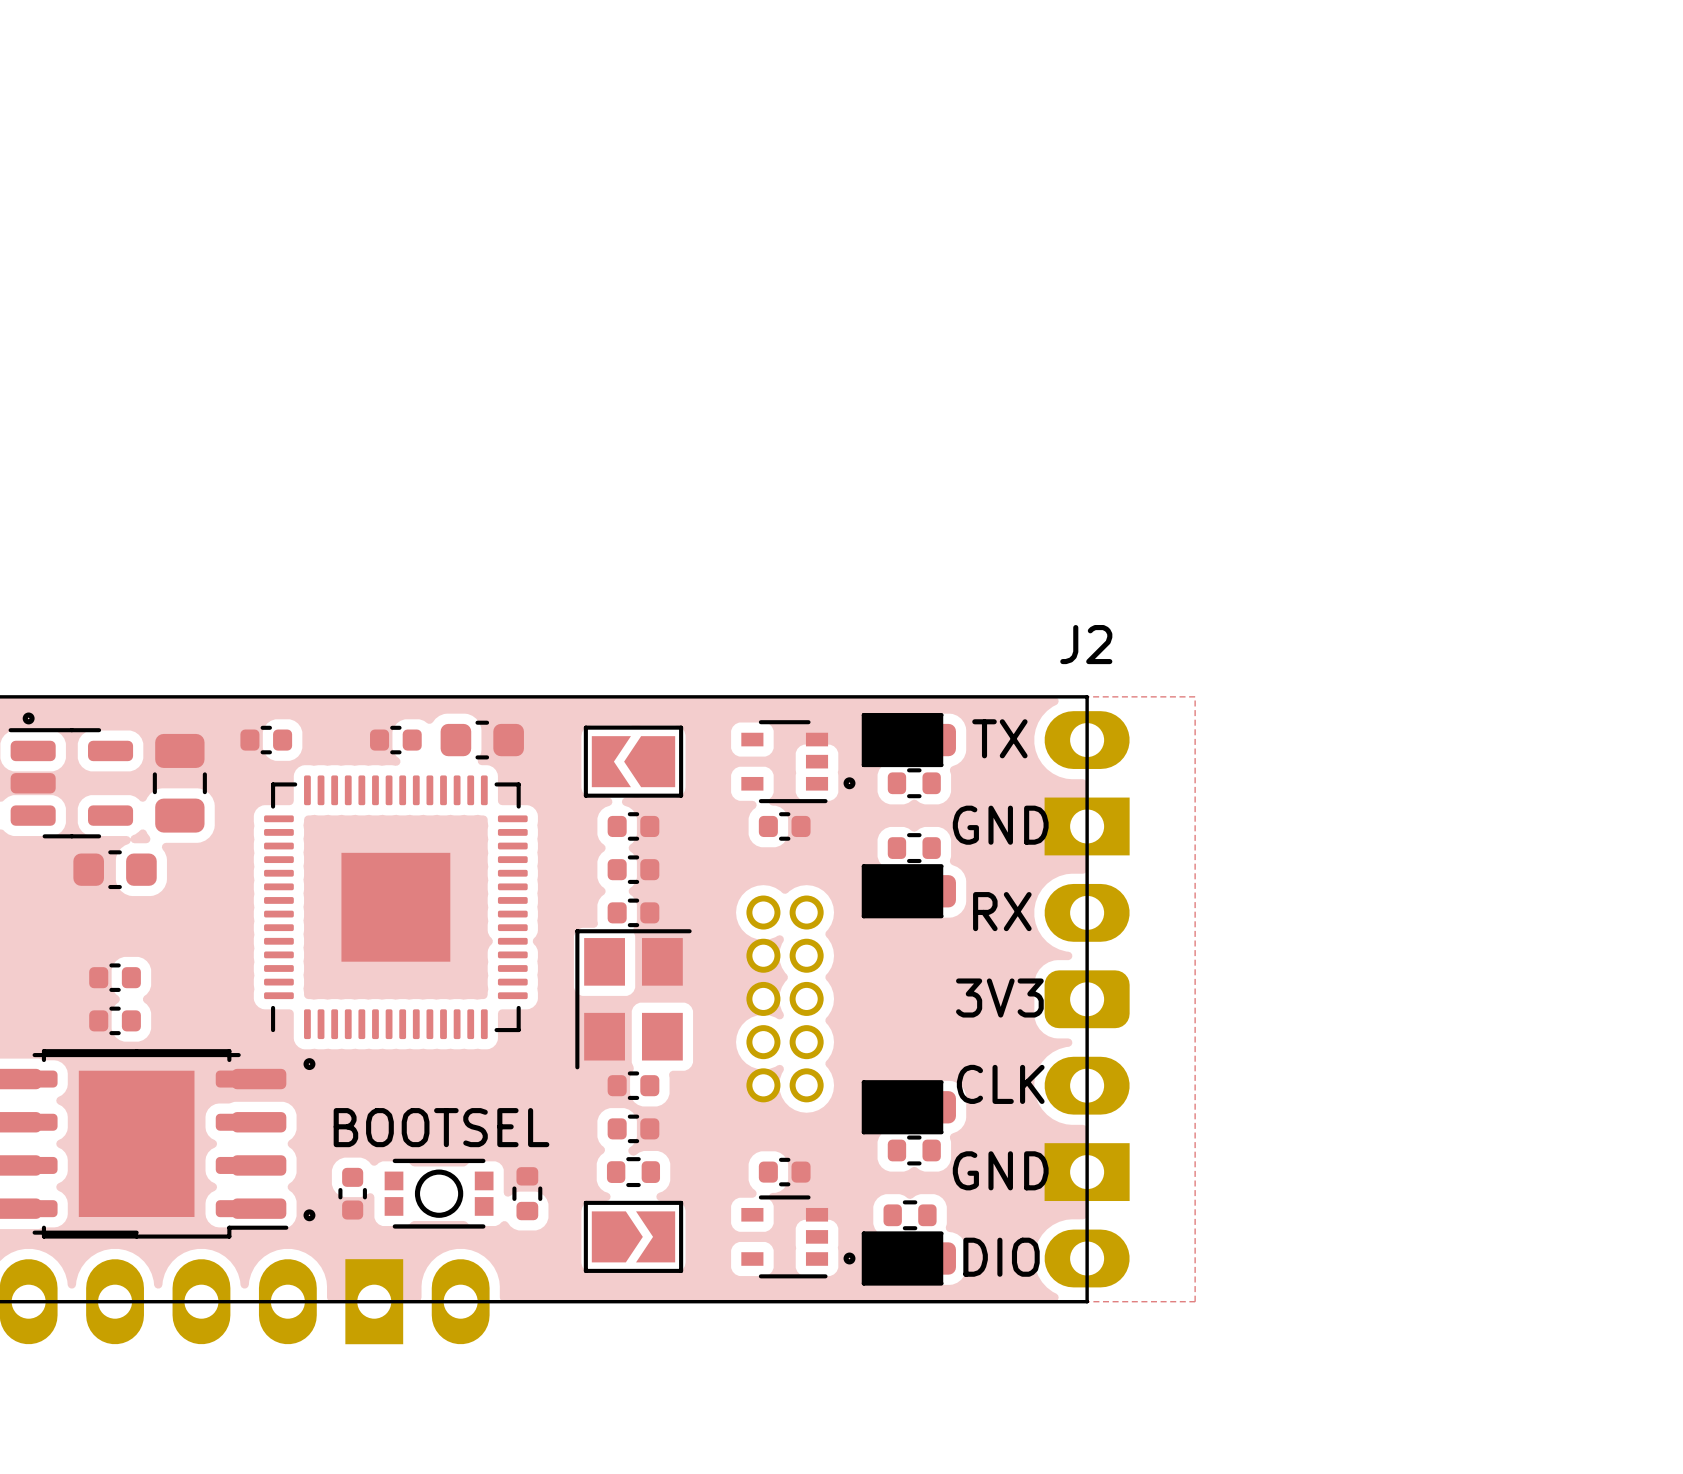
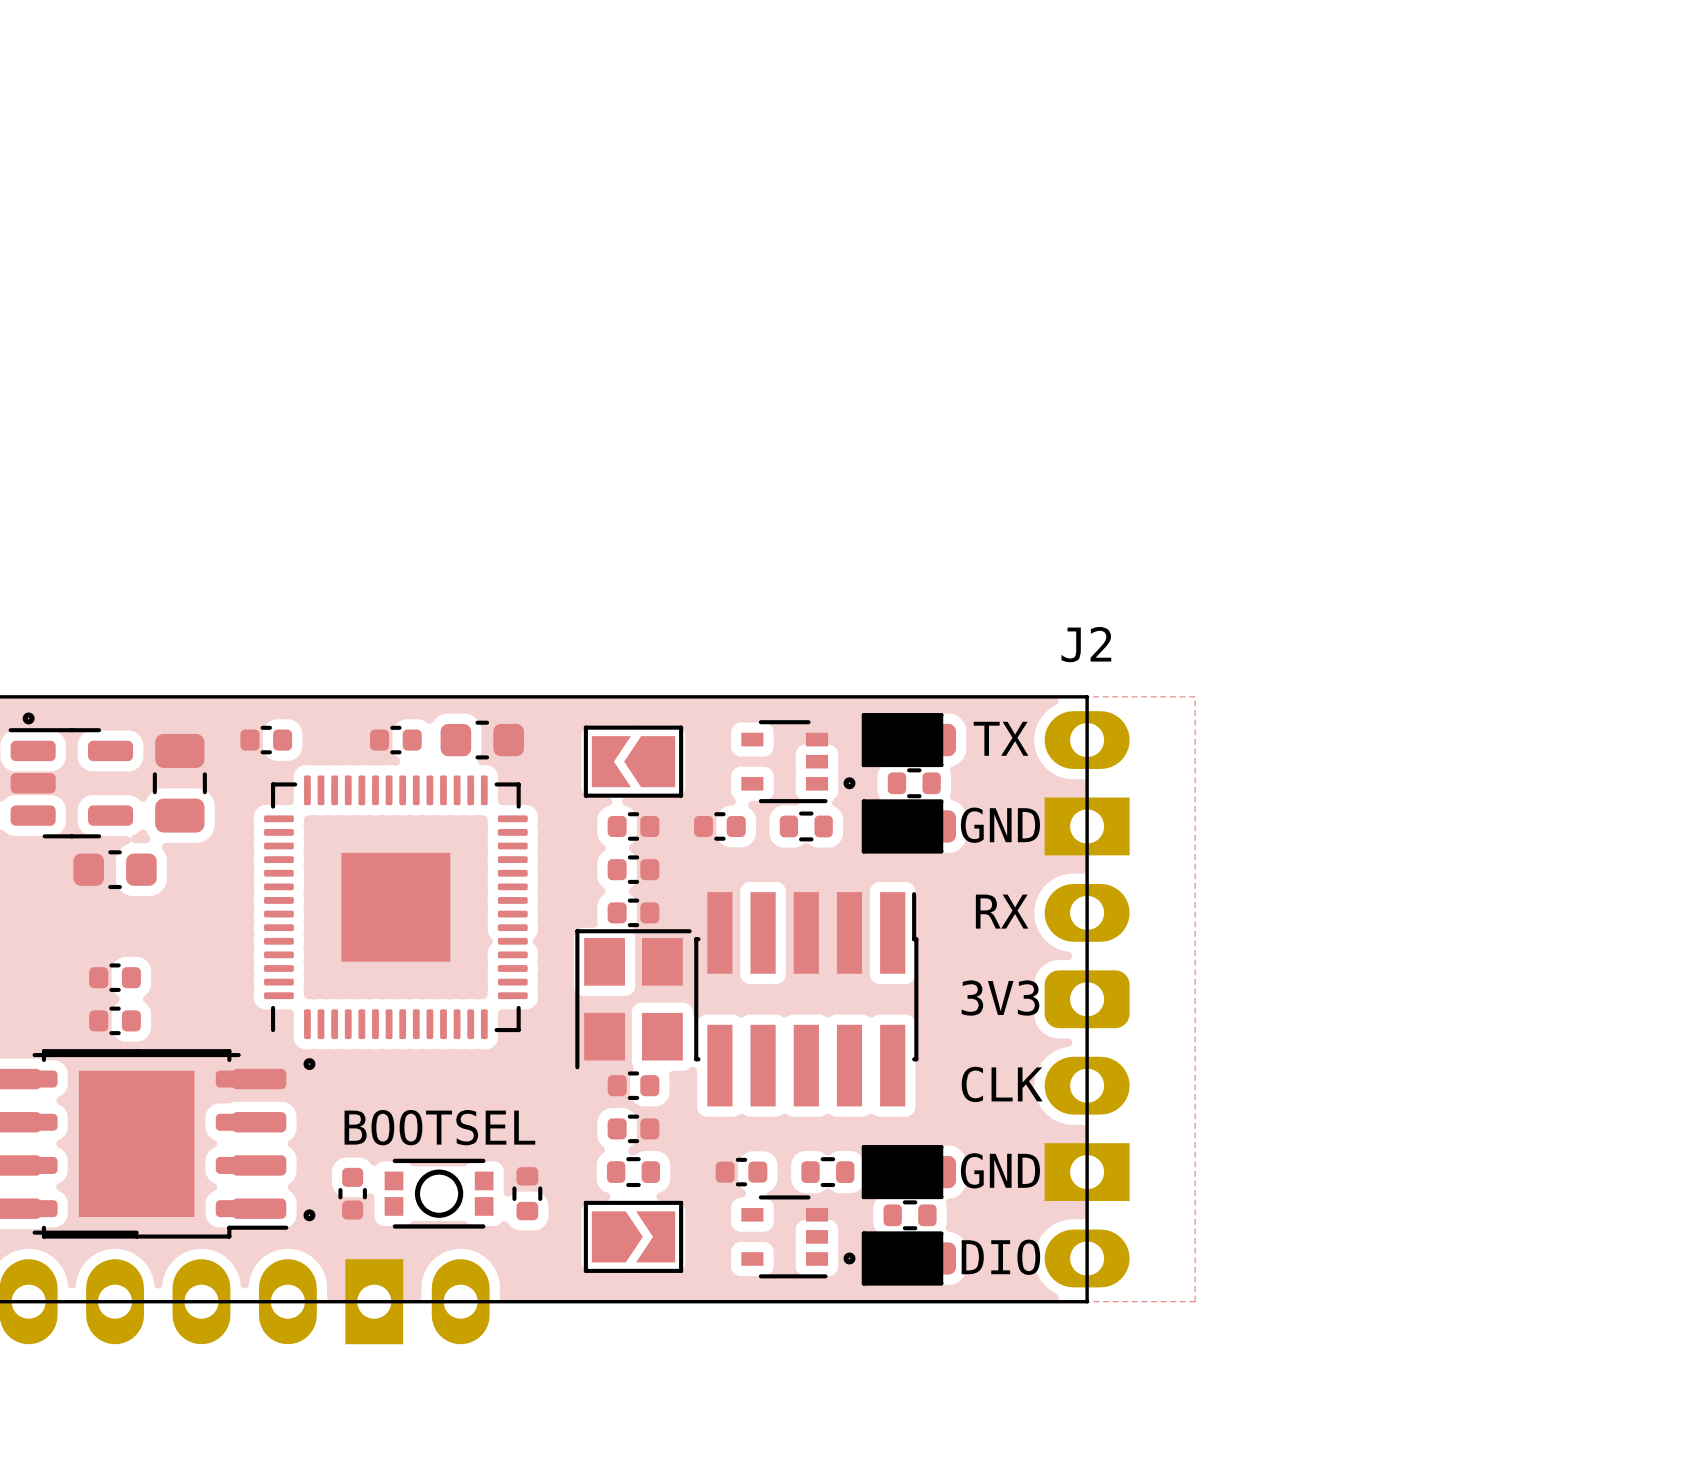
part footprint: [758, 812, 811, 841] -> [779, 811, 833, 842]
part: none -> (719, 826)
part footprint: [887, 833, 941, 864] -> [861, 799, 956, 854]
part: (908, 891) -> none
part footprint: [746, 895, 824, 1103] -> [694, 892, 919, 1107]
part: (908, 1107) -> none
part footprint: [887, 1135, 941, 1166] -> [861, 1145, 956, 1200]
part position: (784, 1172) -> (741, 1172)
part: none -> (827, 1172)

